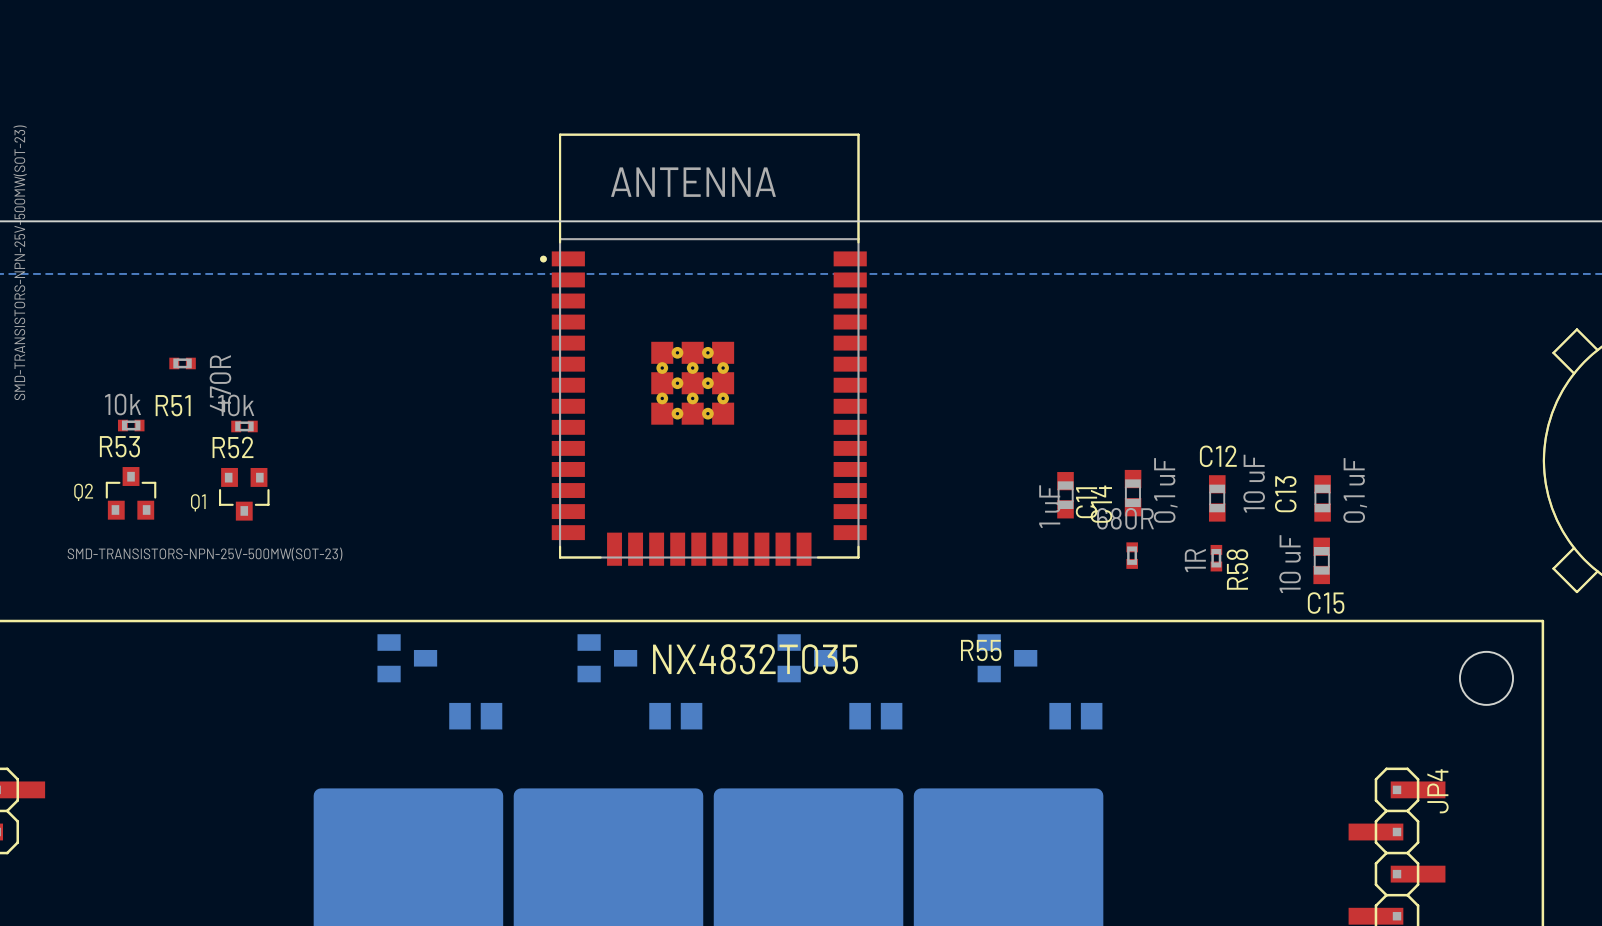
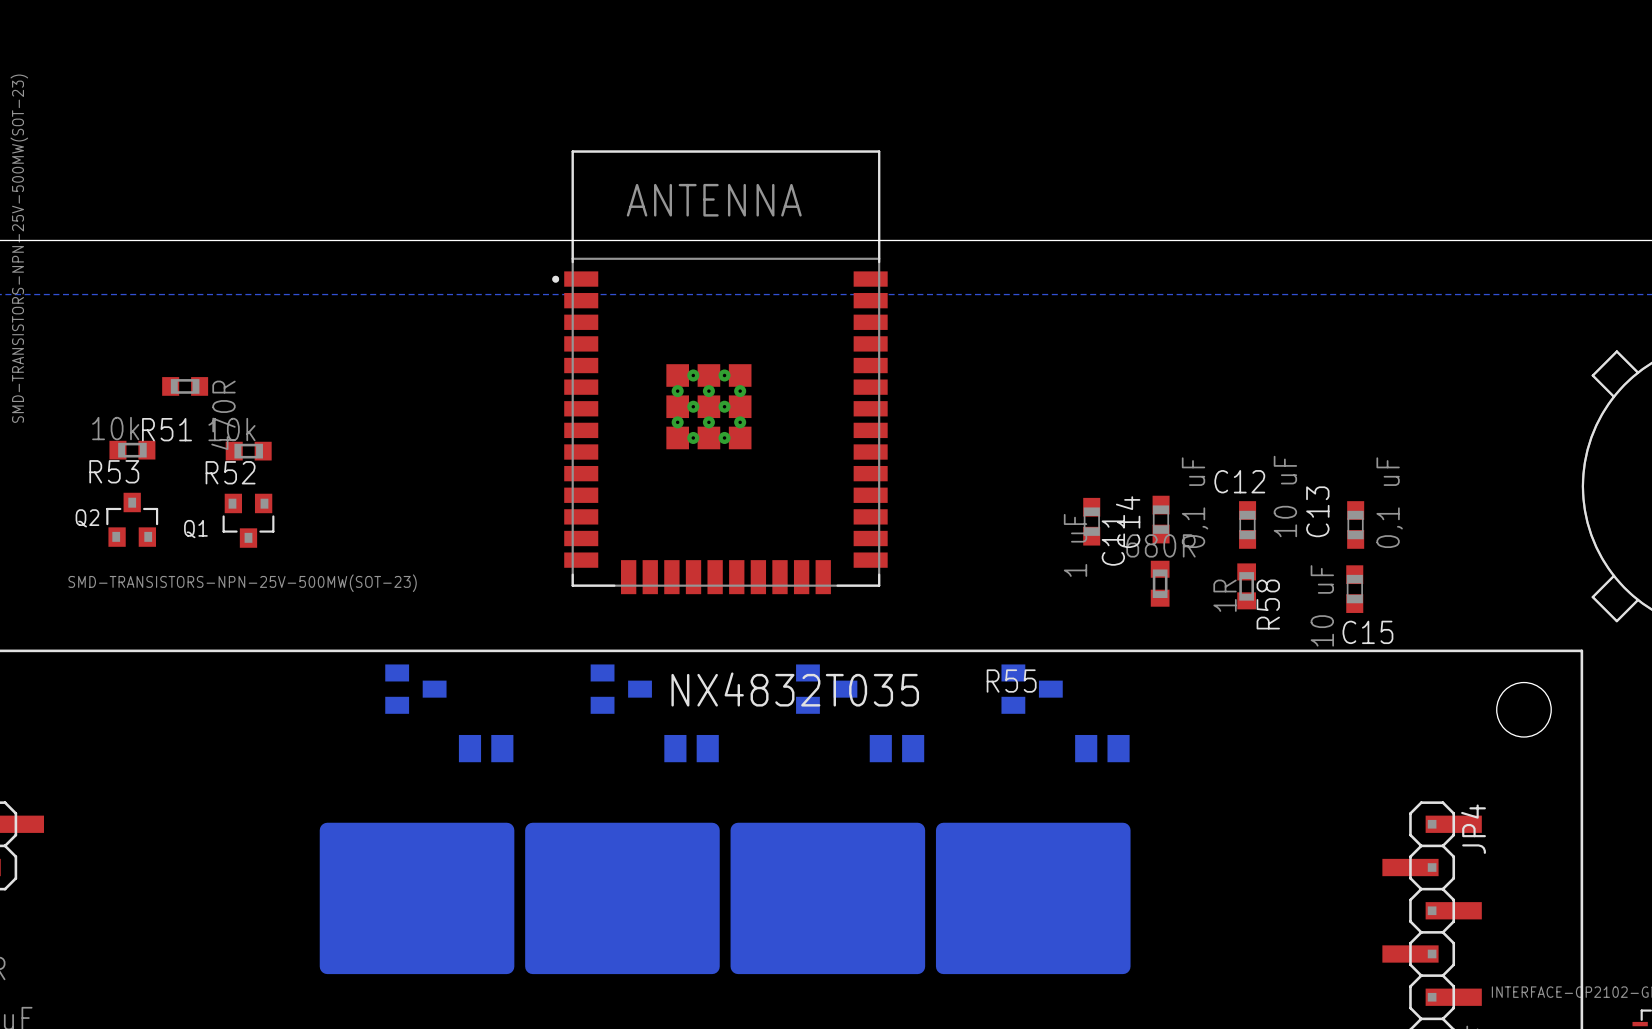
R51 footprint: [169, 357, 196, 370] -> [162, 377, 209, 396]
R53 footprint: [117, 419, 145, 432] -> [109, 440, 156, 460]
R52 footprint: [231, 420, 258, 433] -> [225, 441, 272, 461]
R55 footprint: [1126, 542, 1138, 569] -> [1150, 560, 1170, 607]
R58 footprint: [1210, 544, 1223, 572] -> [1237, 563, 1257, 610]

